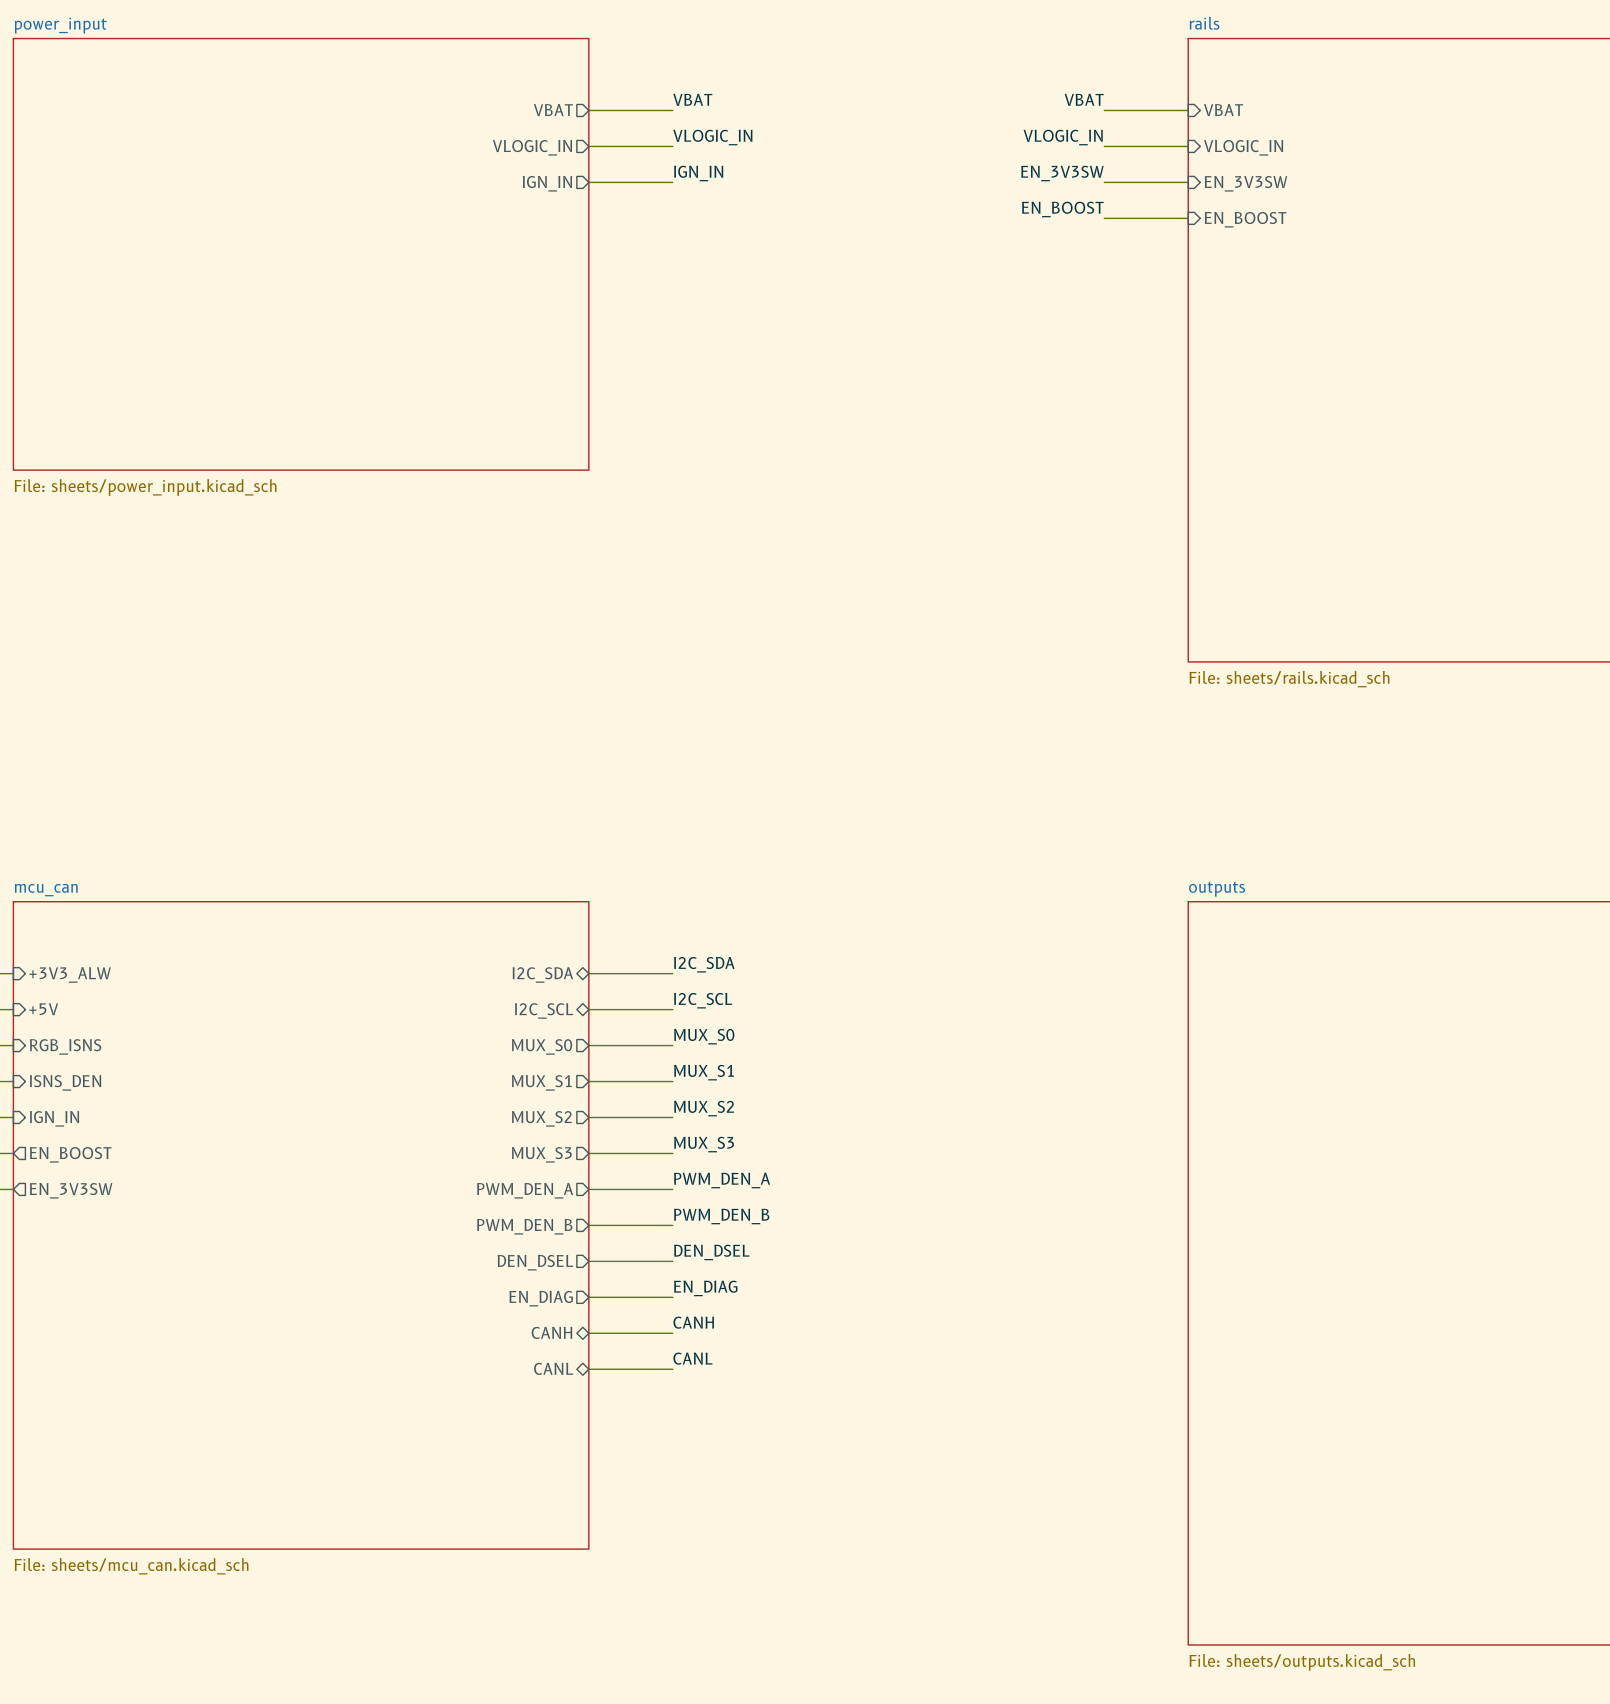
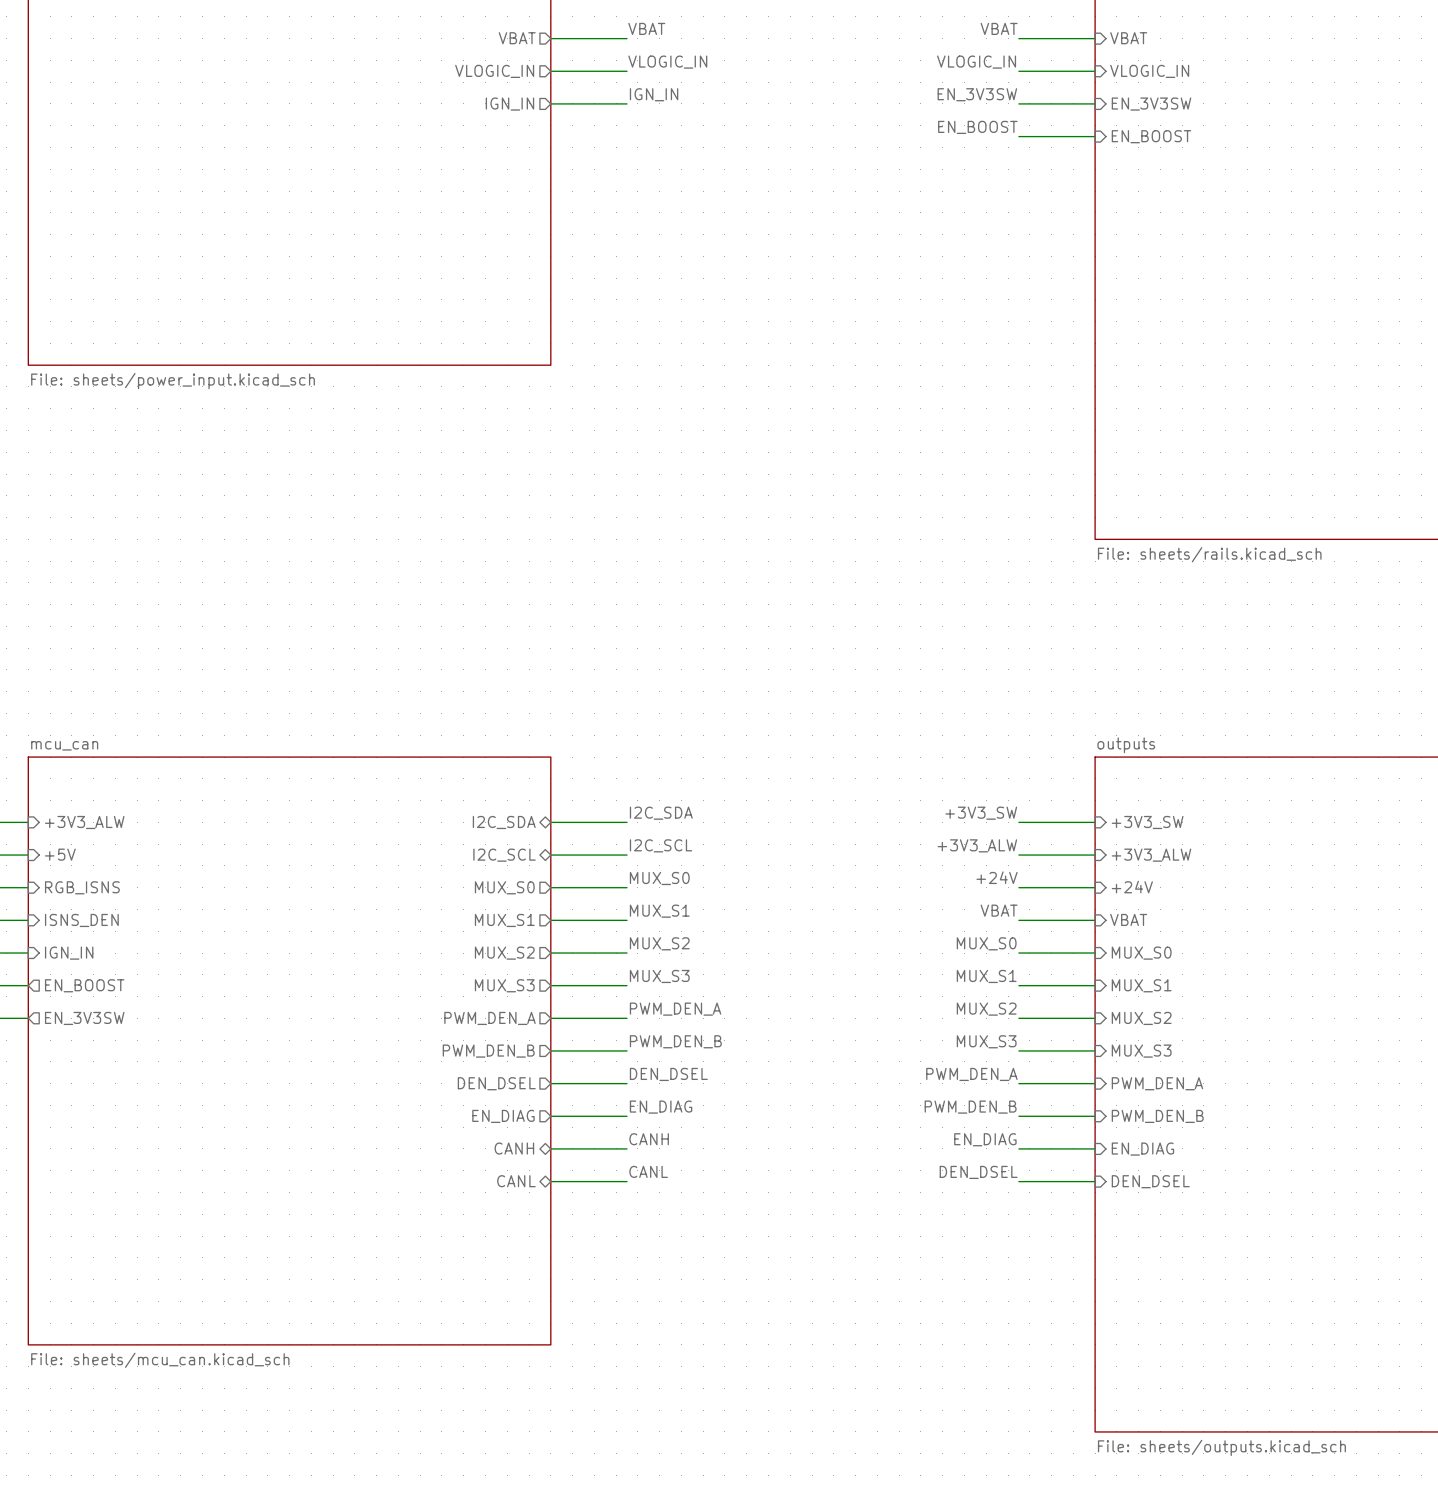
label: none -> +3V3_SW (981, 813)
wire: none -> (1018, 822) (1095, 822)
sheet pin: none -> +3V3_SW (1147, 822)
label: none -> +3V3_ALW (977, 845)
wire: none -> (1018, 855) (1095, 855)
sheet pin: none -> +3V3_ALW (1151, 855)
label: none -> +24V (997, 877)
wire: none -> (1018, 887) (1095, 887)
sheet pin: none -> +24V (1132, 887)
label: none -> VBAT (999, 910)
wire: none -> (1018, 920) (1095, 920)
sheet pin: none -> VBAT (1128, 919)
label: none -> MUX_S0 (986, 943)
wire: none -> (1018, 953) (1095, 953)
sheet pin: none -> MUX_S0 (1141, 953)
label: none -> MUX_S1 (986, 976)
wire: none -> (1018, 985) (1095, 985)
sheet pin: none -> MUX_S1 (1141, 985)
label: none -> MUX_S2 (986, 1009)
wire: none -> (1018, 1018) (1095, 1018)
sheet pin: none -> MUX_S2 (1141, 1018)
label: none -> MUX_S3 (986, 1041)
wire: none -> (1018, 1050) (1095, 1050)
sheet pin: none -> MUX_S3 (1141, 1051)
label: none -> PWM_DEN_A (971, 1074)
wire: none -> (1018, 1083) (1095, 1083)
sheet pin: none -> PWM_DEN_A (1157, 1083)
label: none -> PWM_DEN_B (970, 1107)
wire: none -> (1018, 1116) (1095, 1116)
sheet pin: none -> PWM_DEN_B (1157, 1116)
label: none -> EN_DIAG (985, 1139)
wire: none -> (1018, 1148) (1095, 1148)
sheet pin: none -> EN_DIAG (1142, 1149)
label: none -> DEN_DSEL (978, 1172)
wire: none -> (1018, 1181) (1095, 1181)
sheet pin: none -> DEN_DSEL (1150, 1181)

